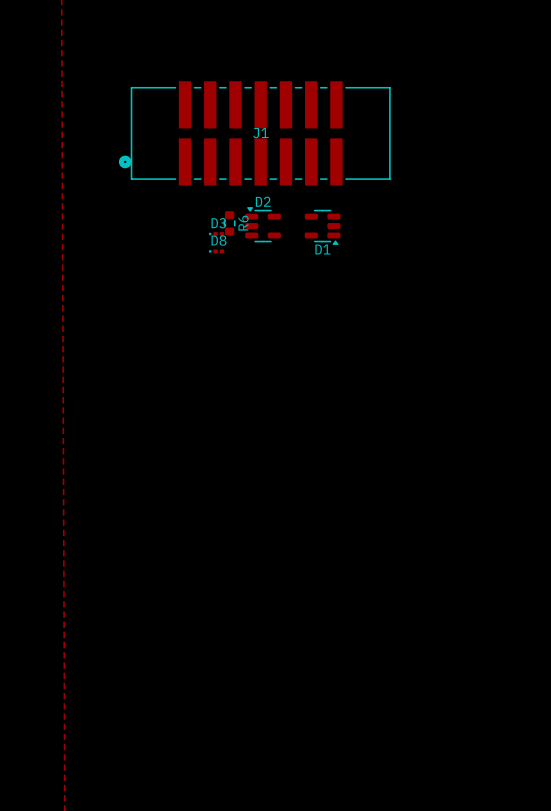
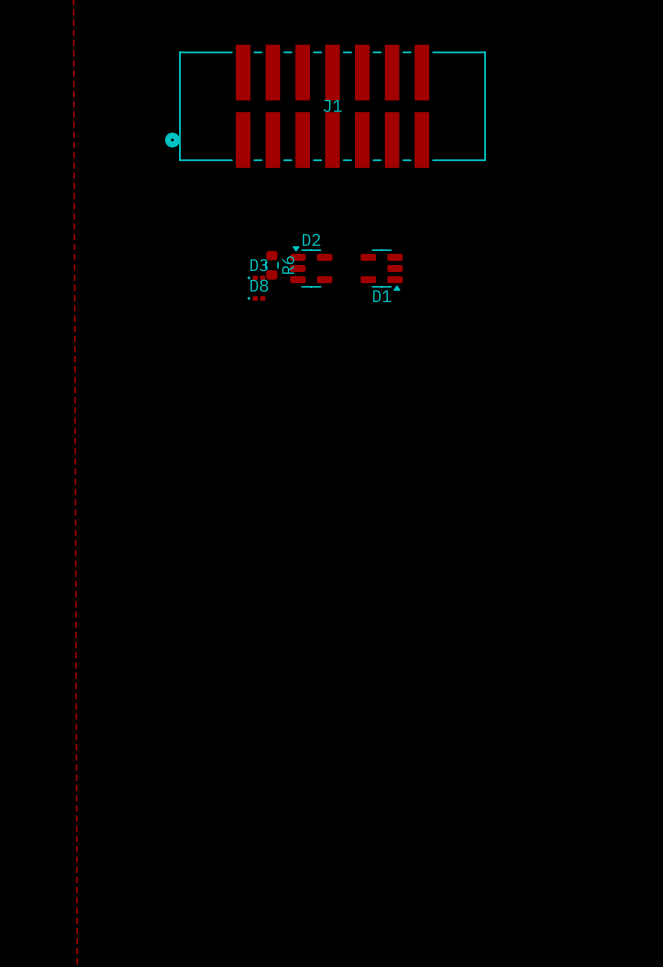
J1 position: (254, 133) -> (325, 106)

